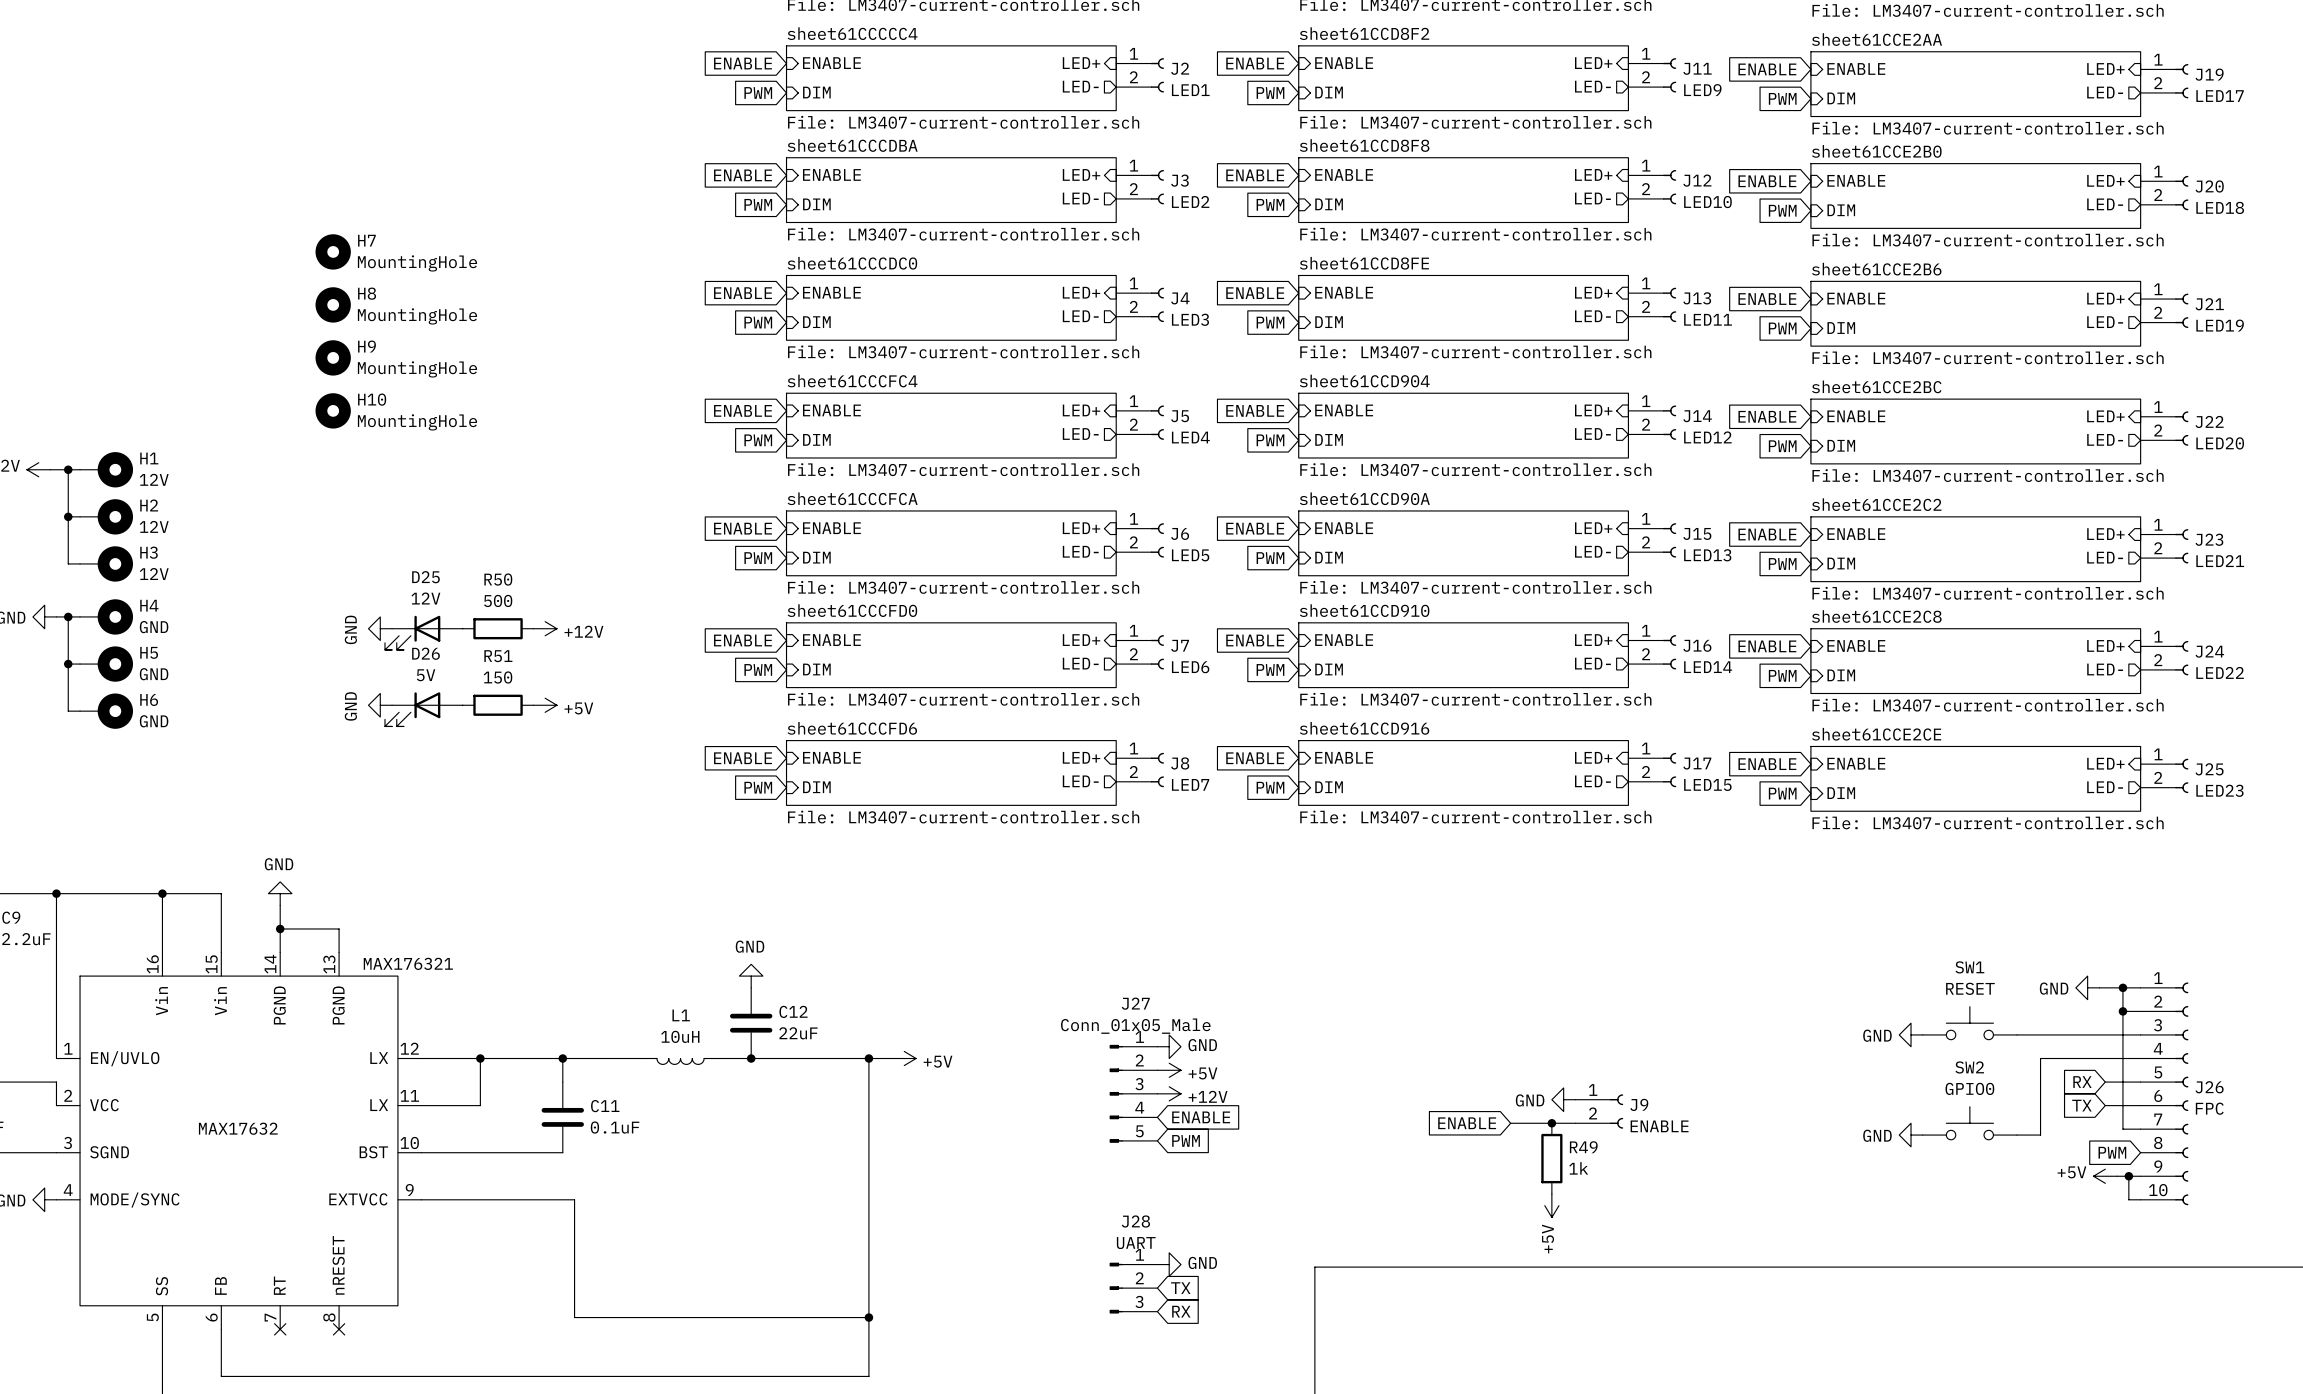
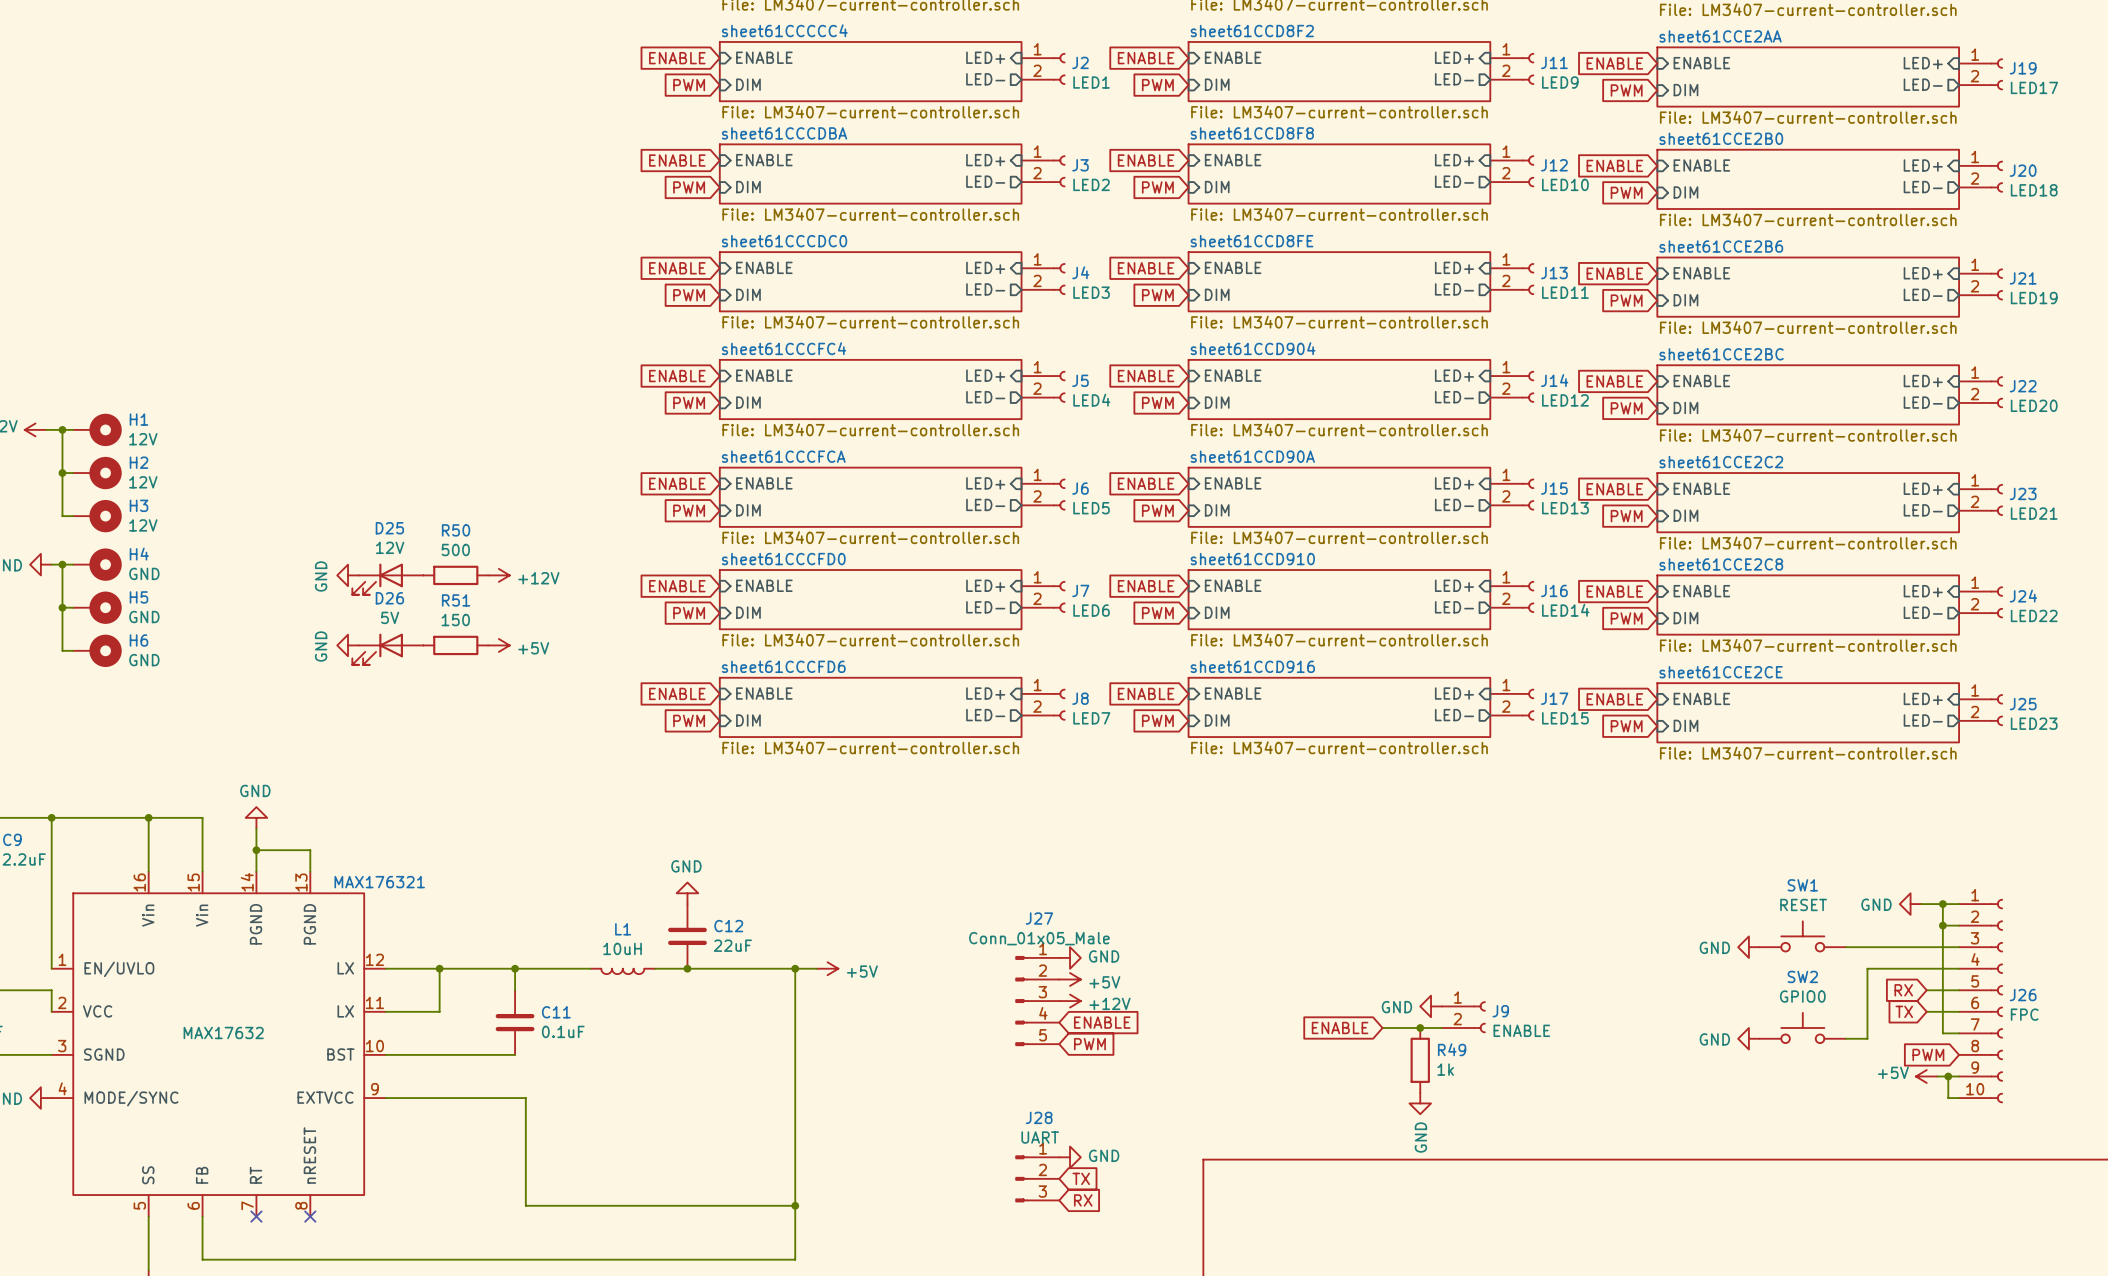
H7: MountingHole (333, 251) -> none
H8: MountingHole (333, 304) -> none
H9: MountingHole (333, 357) -> none
H10: MountingHole (333, 410) -> none
power symbol: +5V (1551, 1205) -> GND (1420, 1103)

